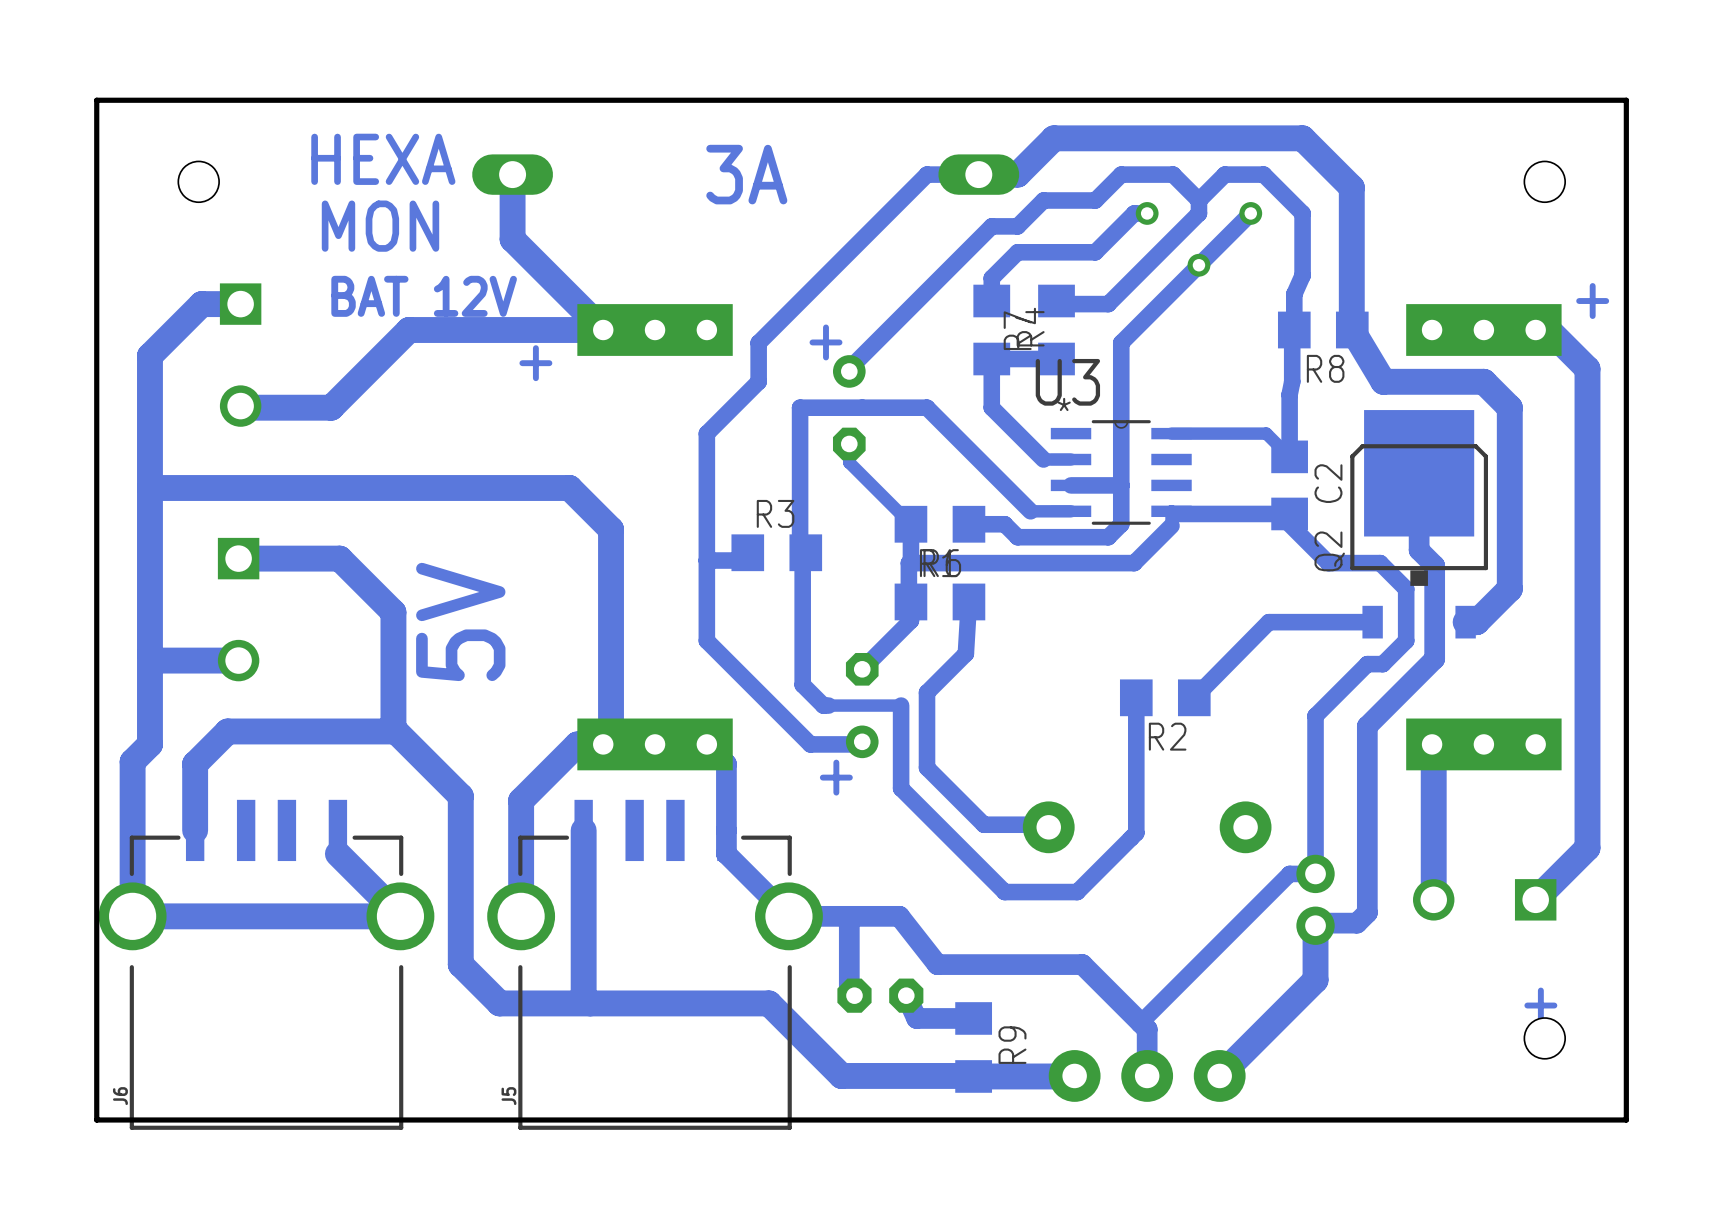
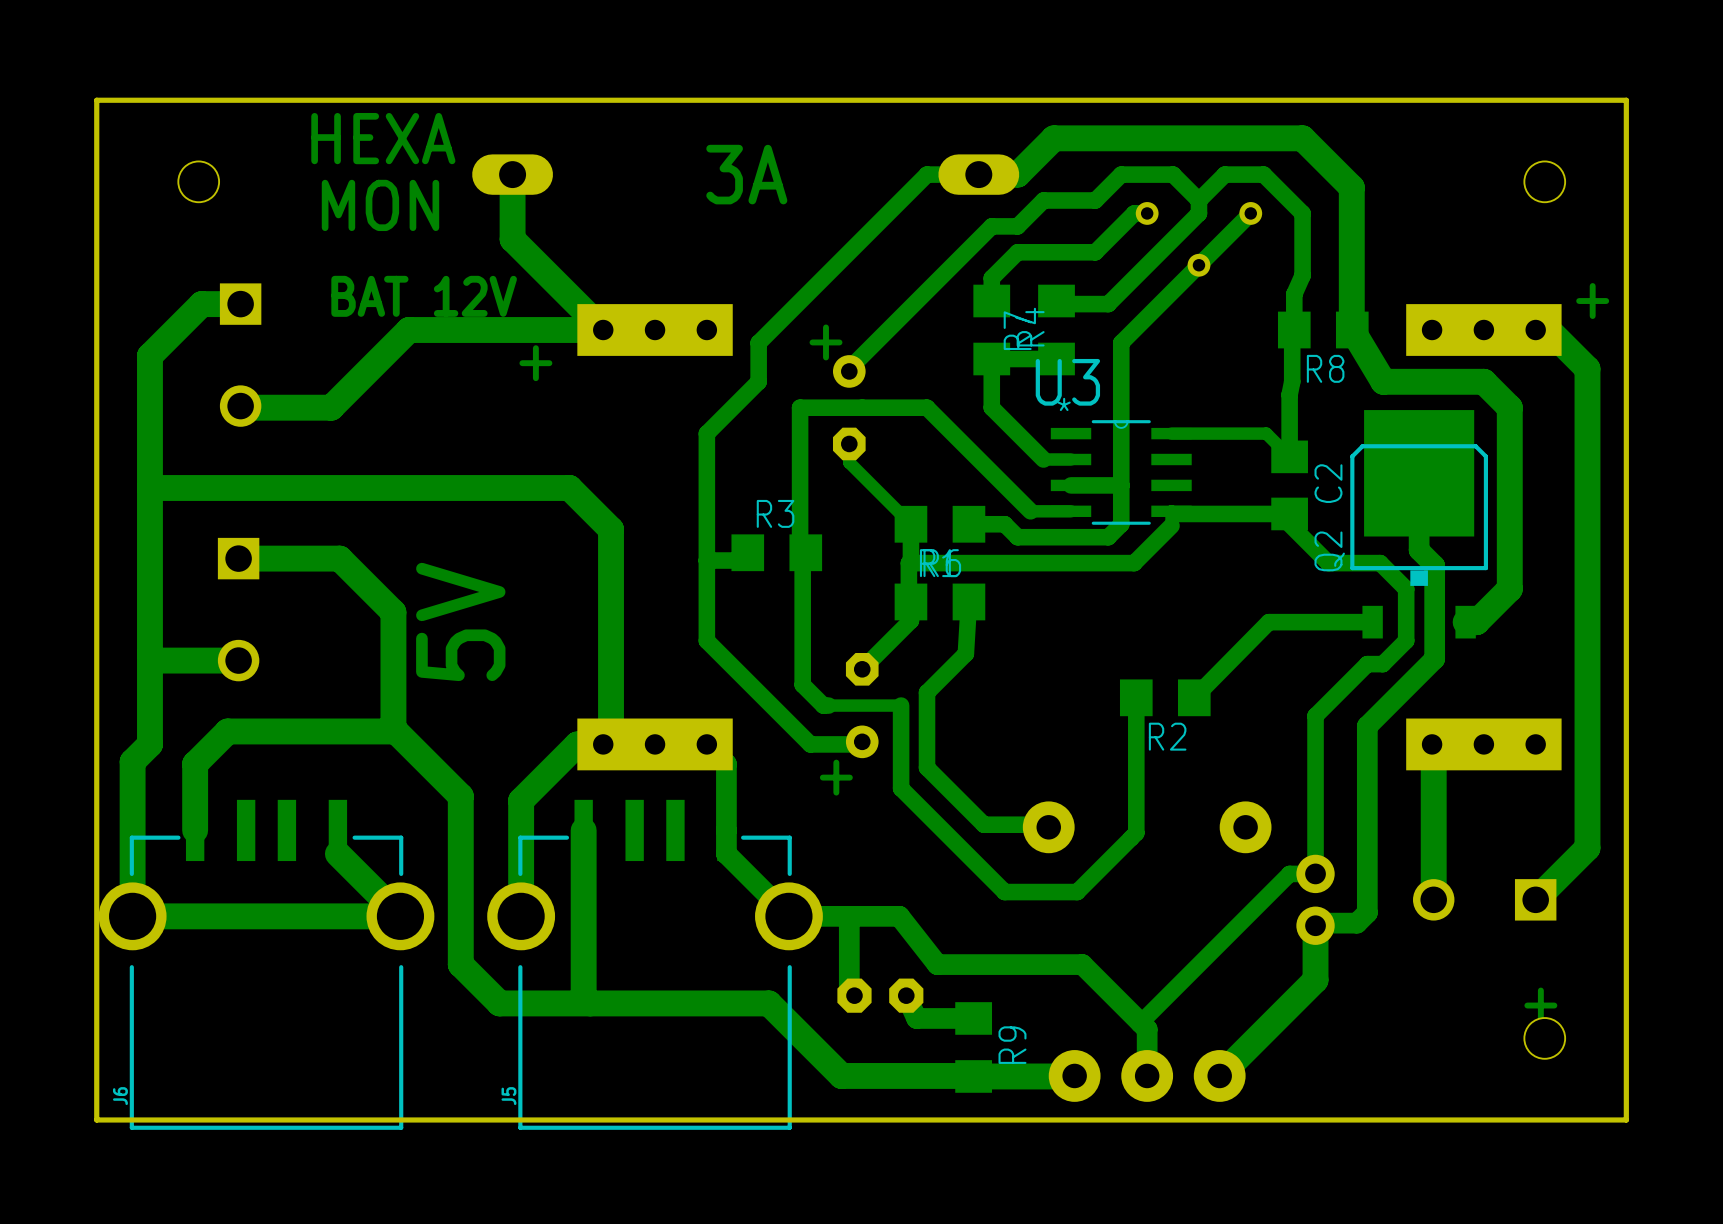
text position: HEXA (383, 159) -> HEXA (383, 138)
text position: MON (380, 226) -> MON (380, 205)

